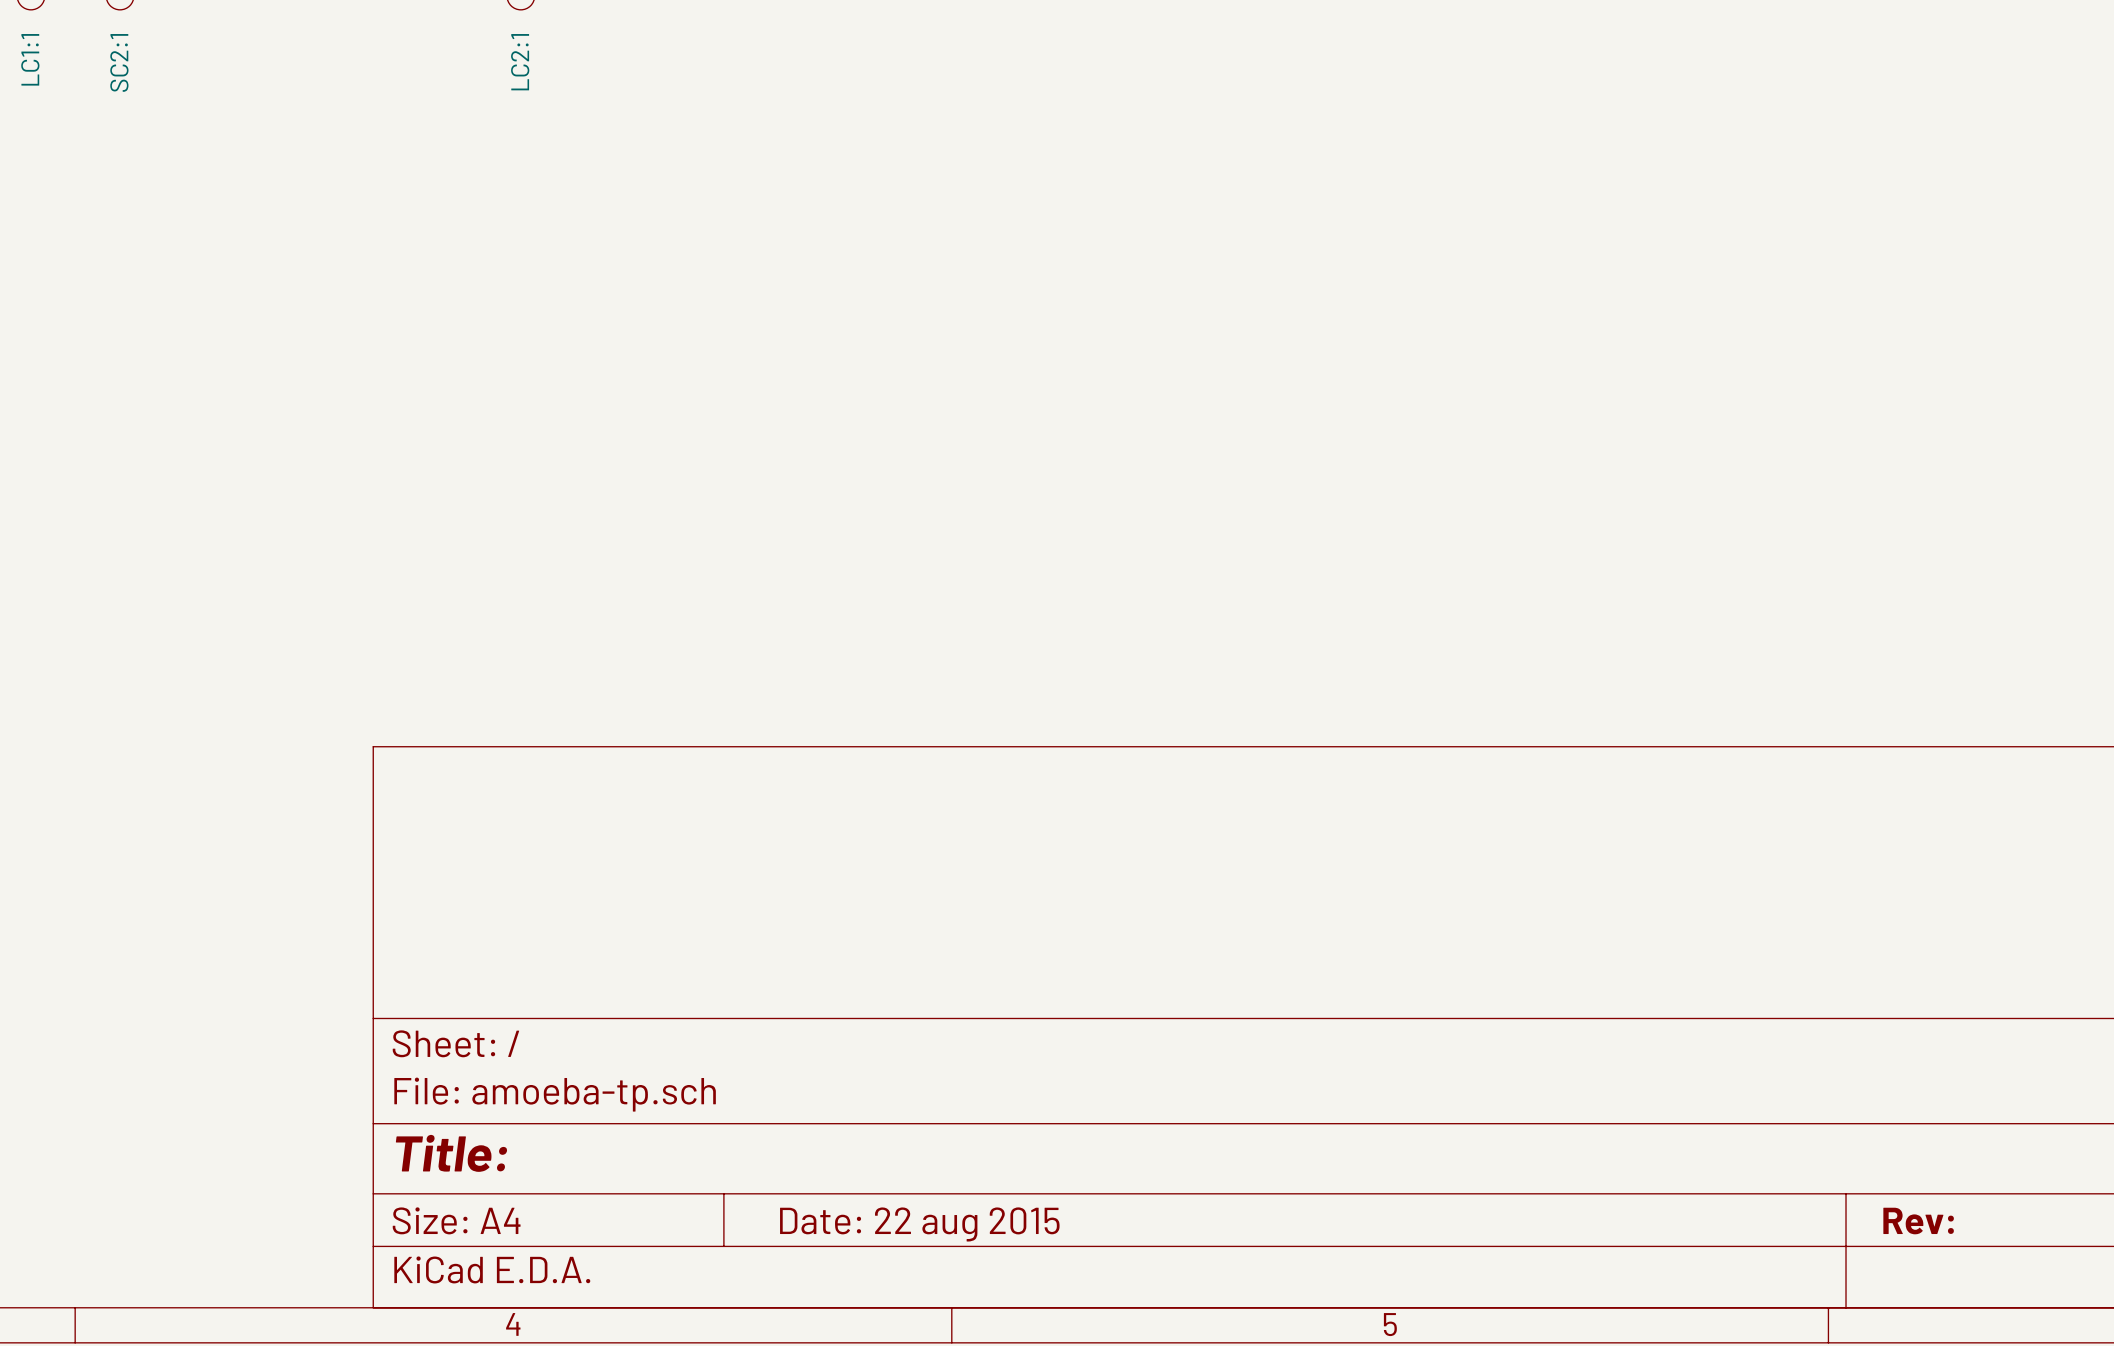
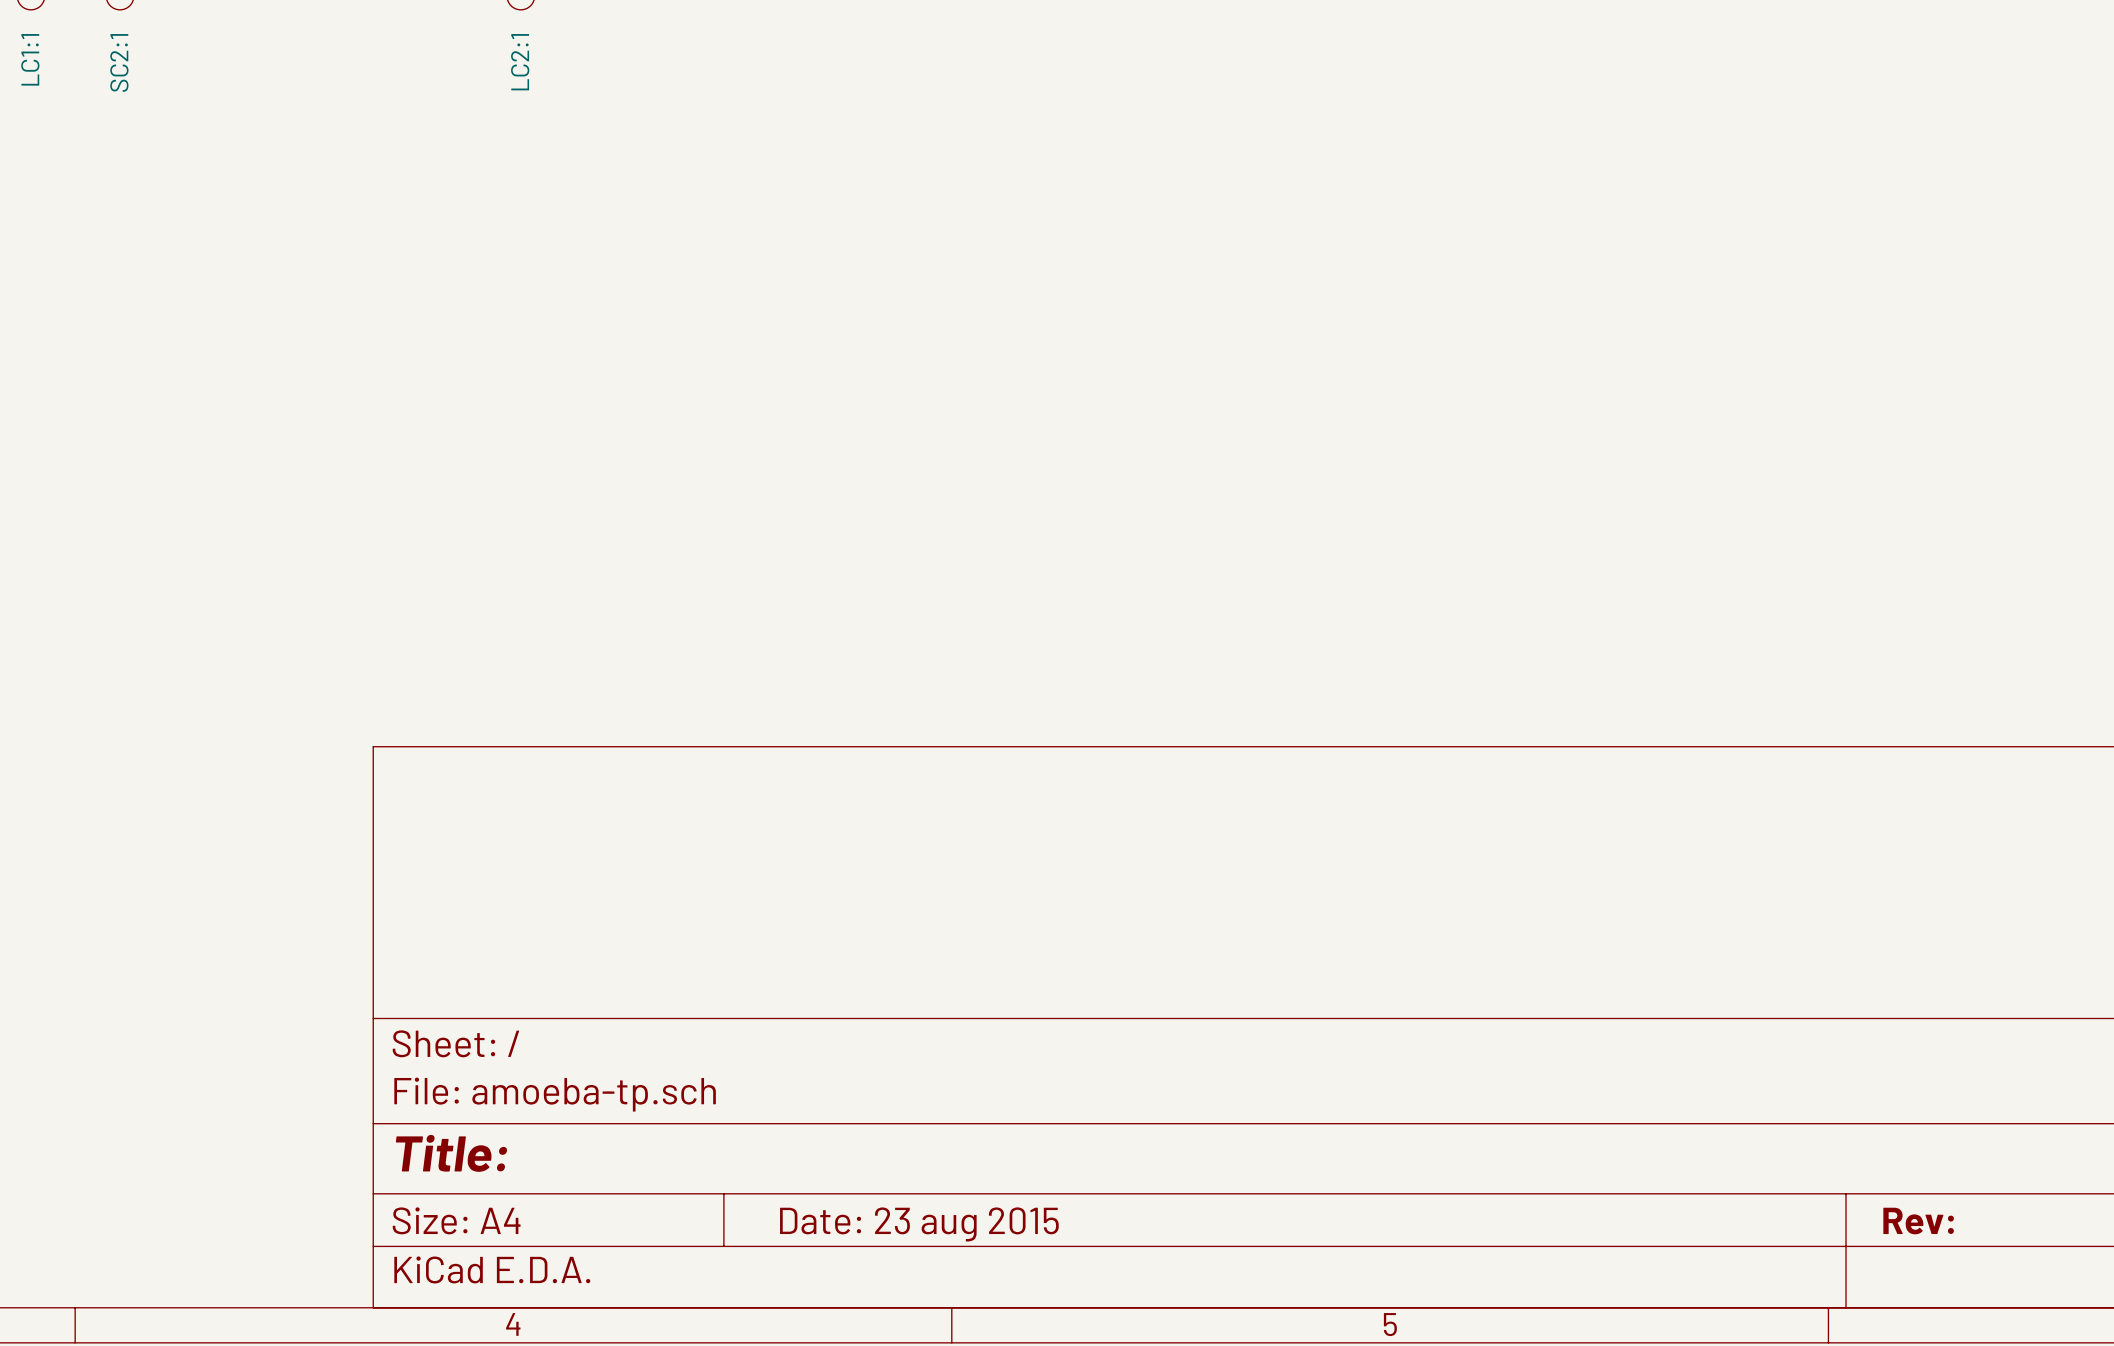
title block: Date: 22 aug 2015 (919, 1224) -> Date: 23 aug 2015 (919, 1224)

